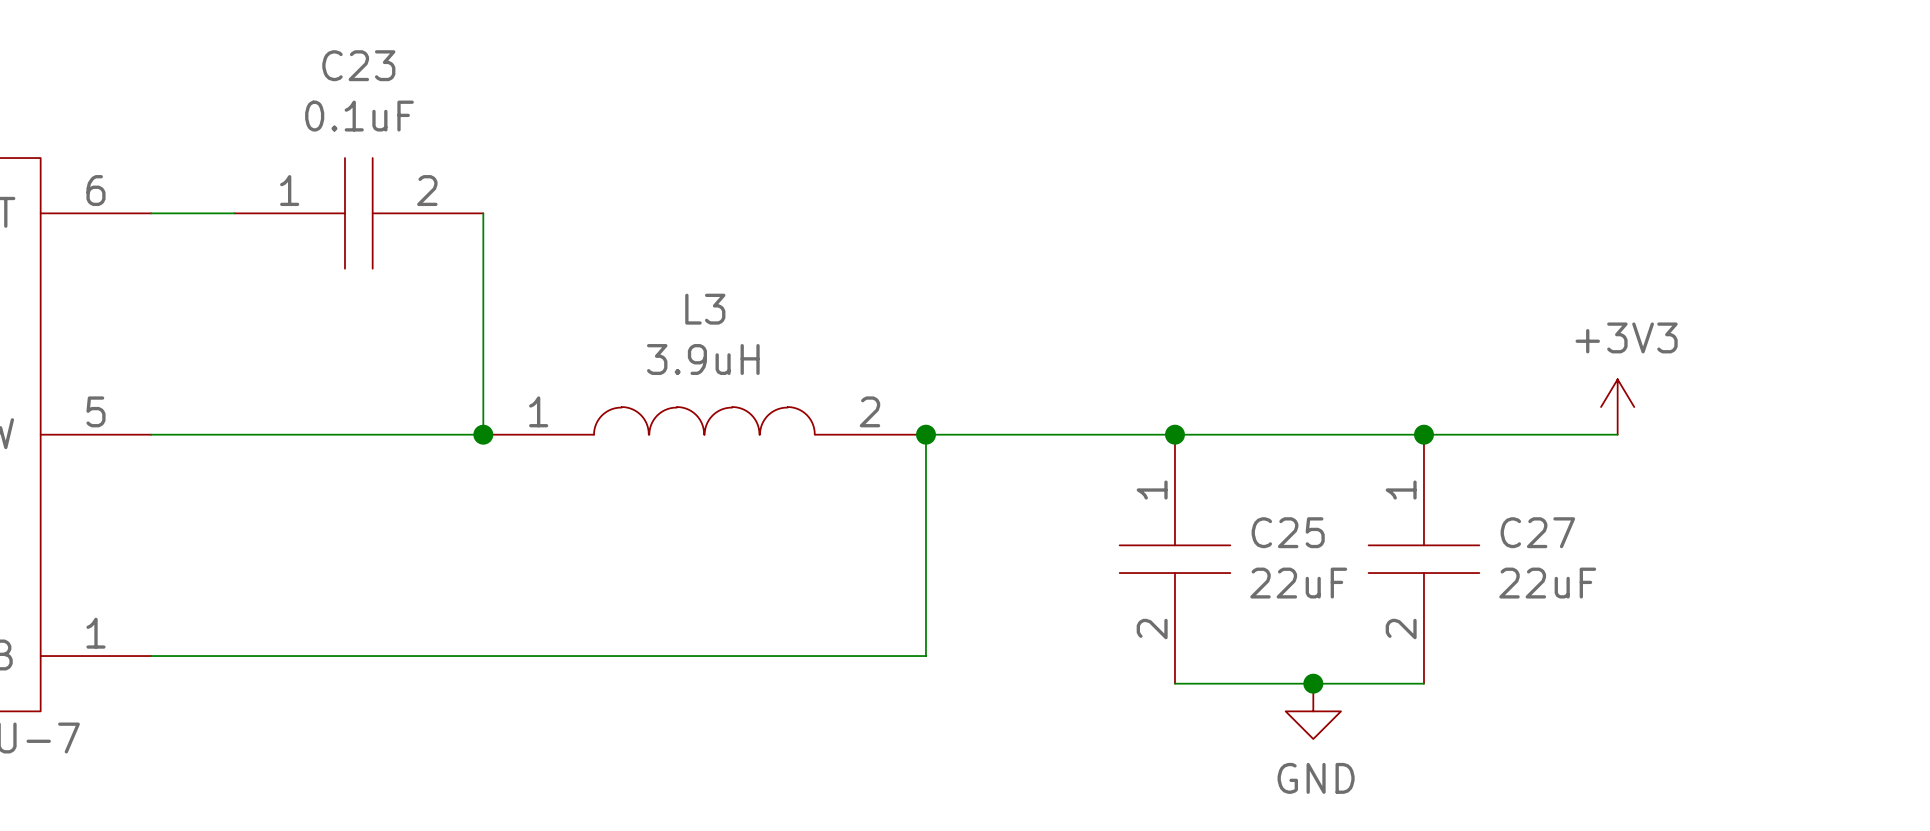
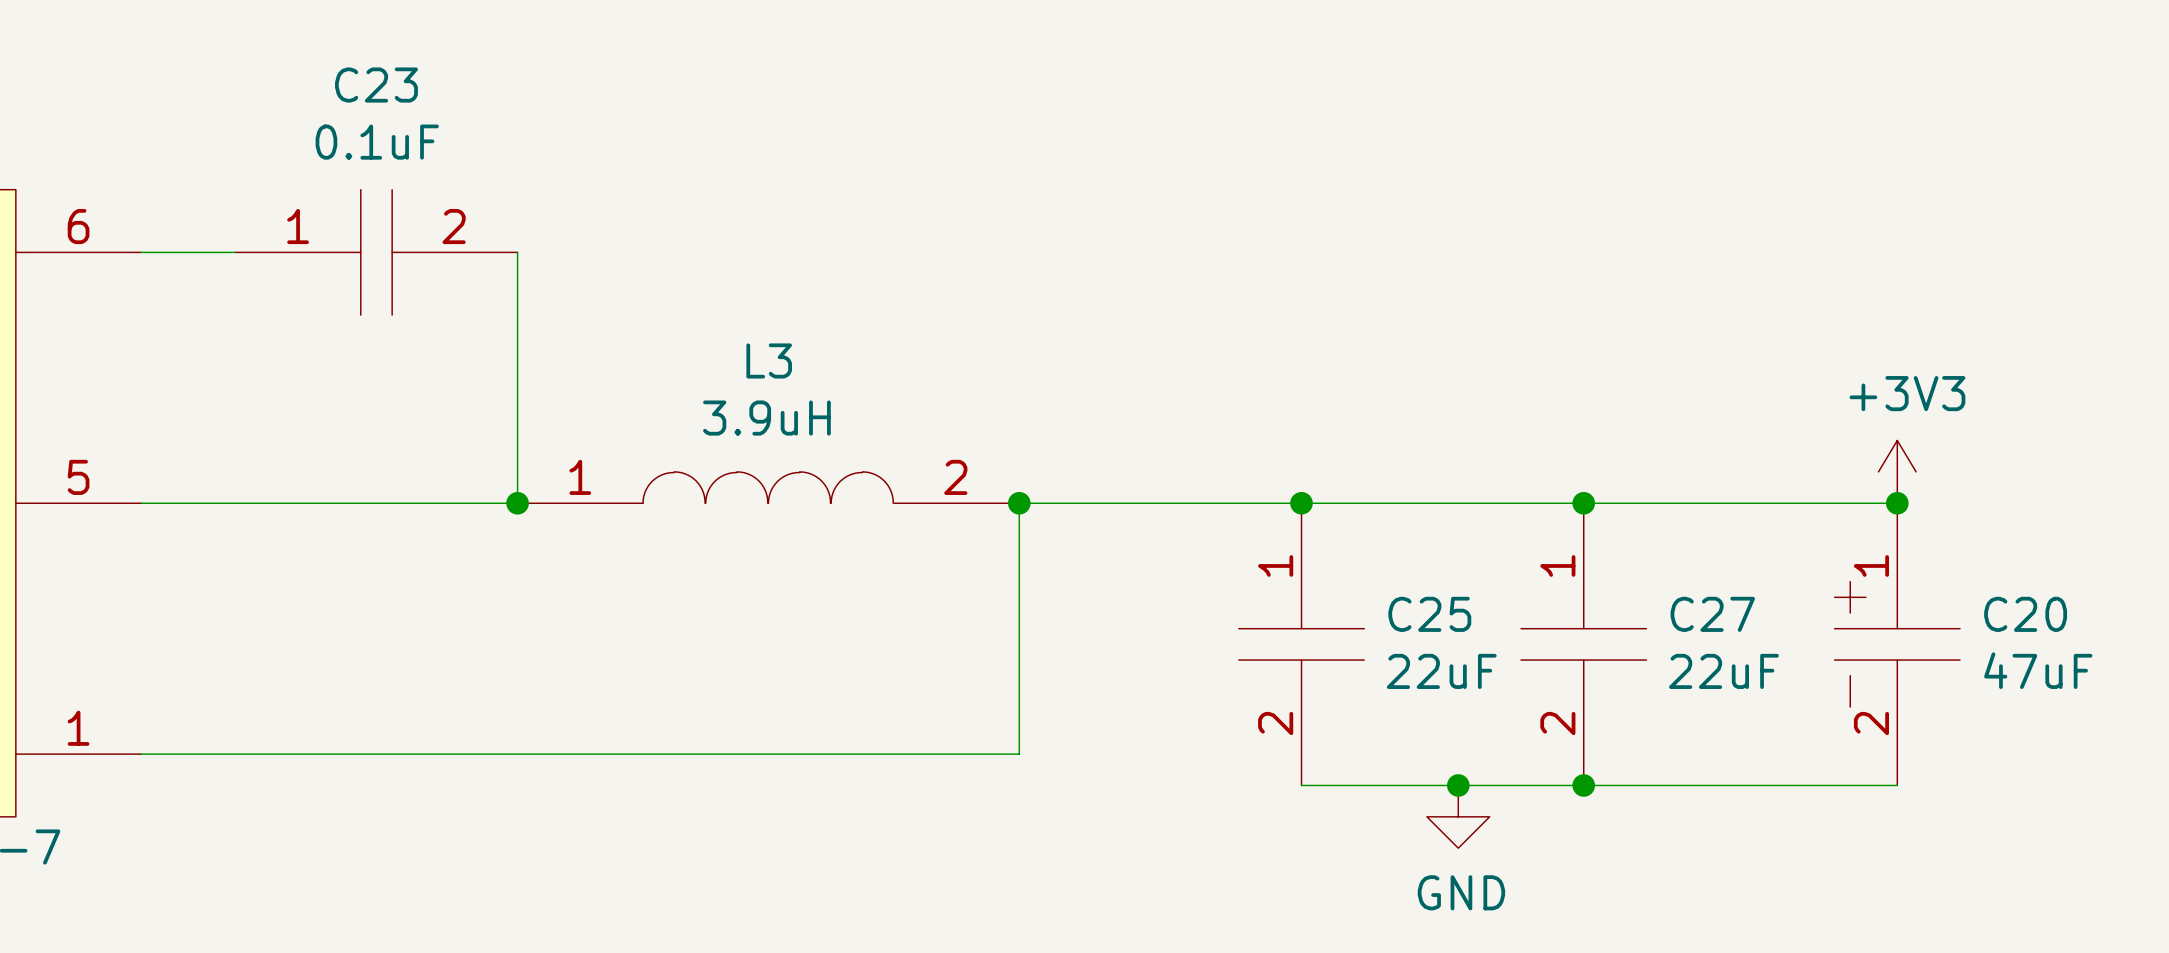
power symbol position: +3V3 (1617, 407) -> +3V3 (1897, 471)
wire: none -> (1803, 503) (1897, 503)
junction: none -> (1897, 503)
C20: none -> (1897, 644)
wire: none -> (1583, 785) (1897, 785)
junction: none -> (1583, 785)

